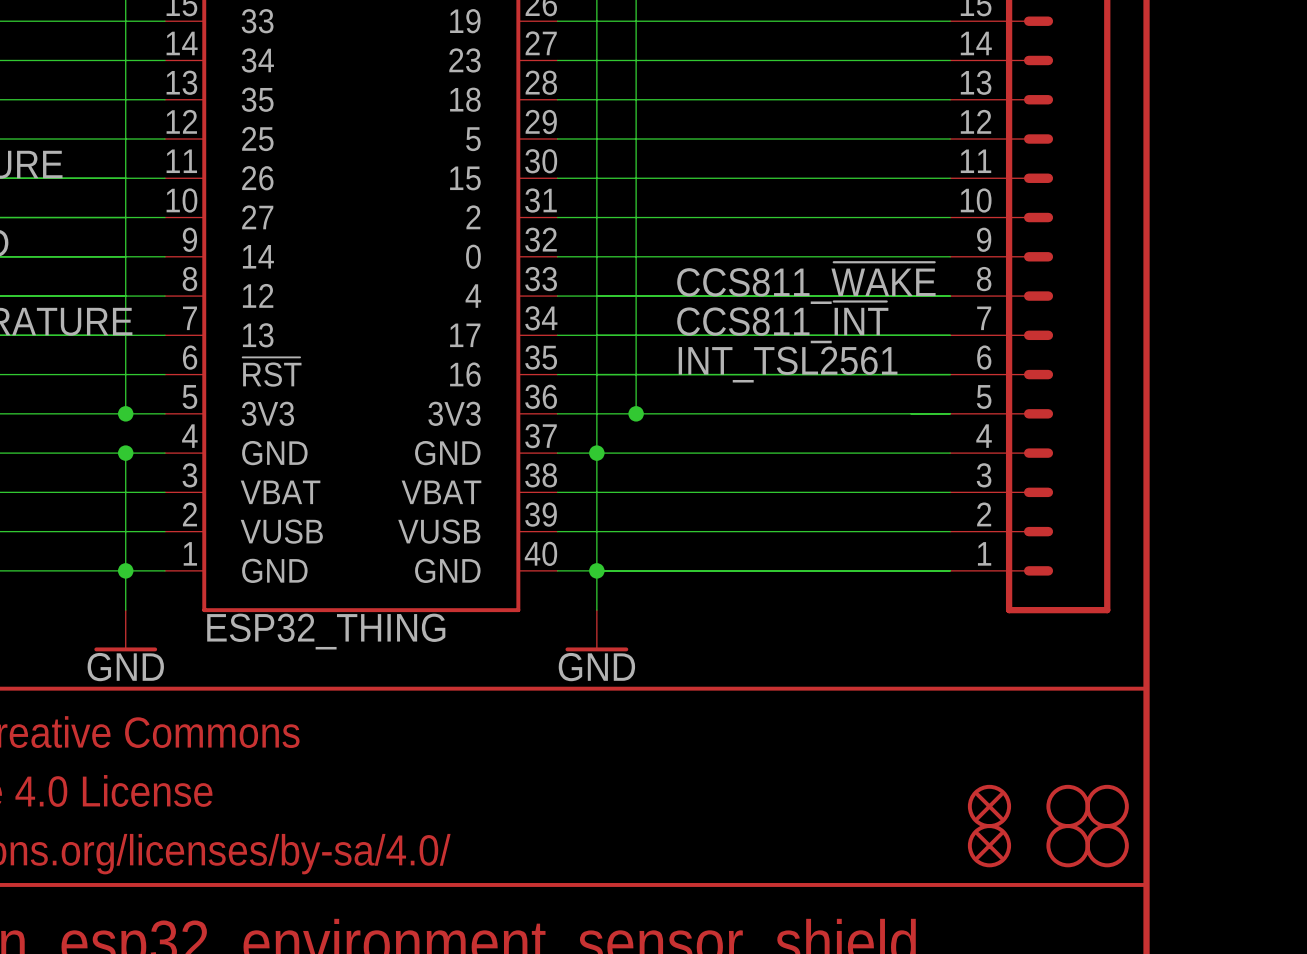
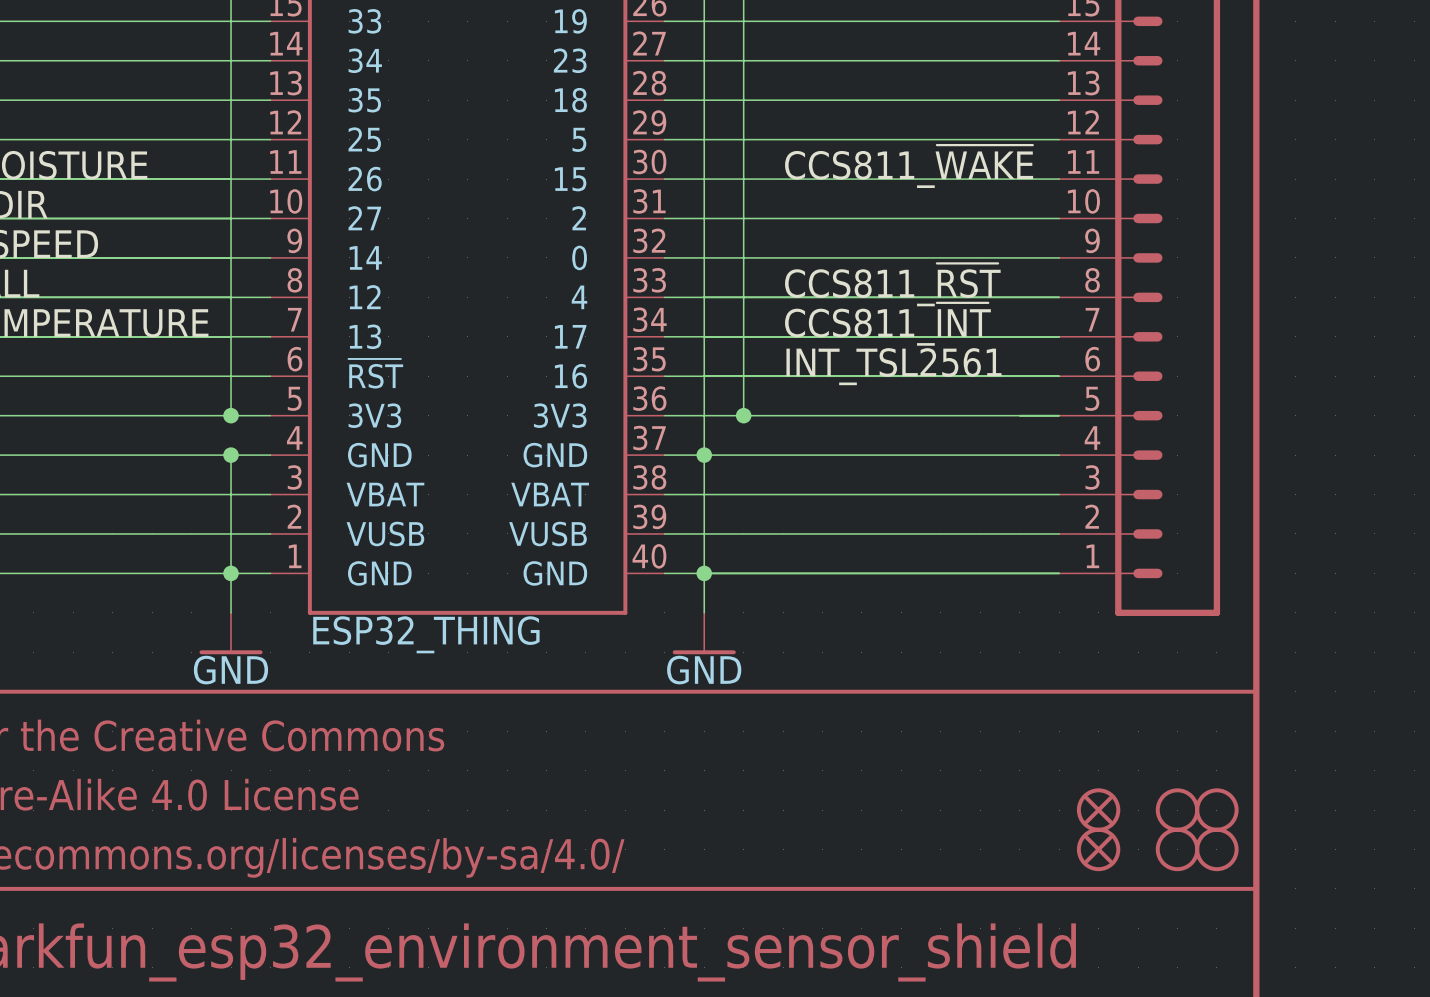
label: none -> CCS811_~{WAKE} (909, 166)
label: CCS811_~{WAKE} (806, 283) -> CCS811_~{RST} (892, 284)

